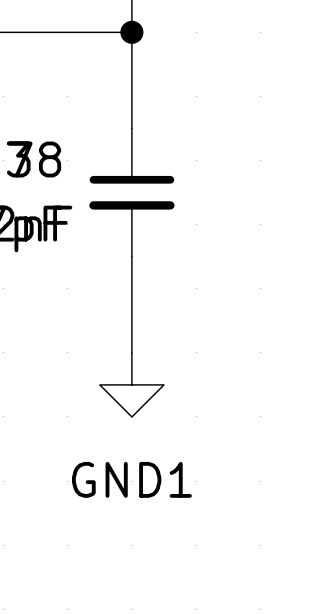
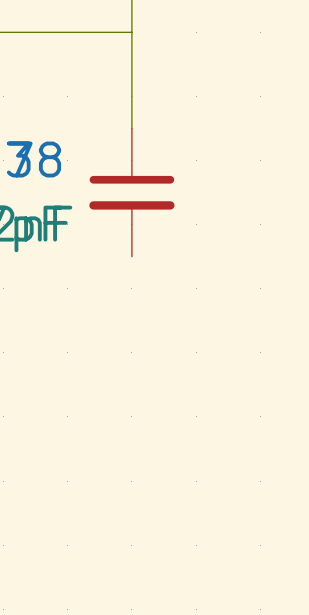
junction: (131, 32) -> none
wire: (131, 256) (131, 352) -> none
power symbol: GND1 (131, 384) -> none

